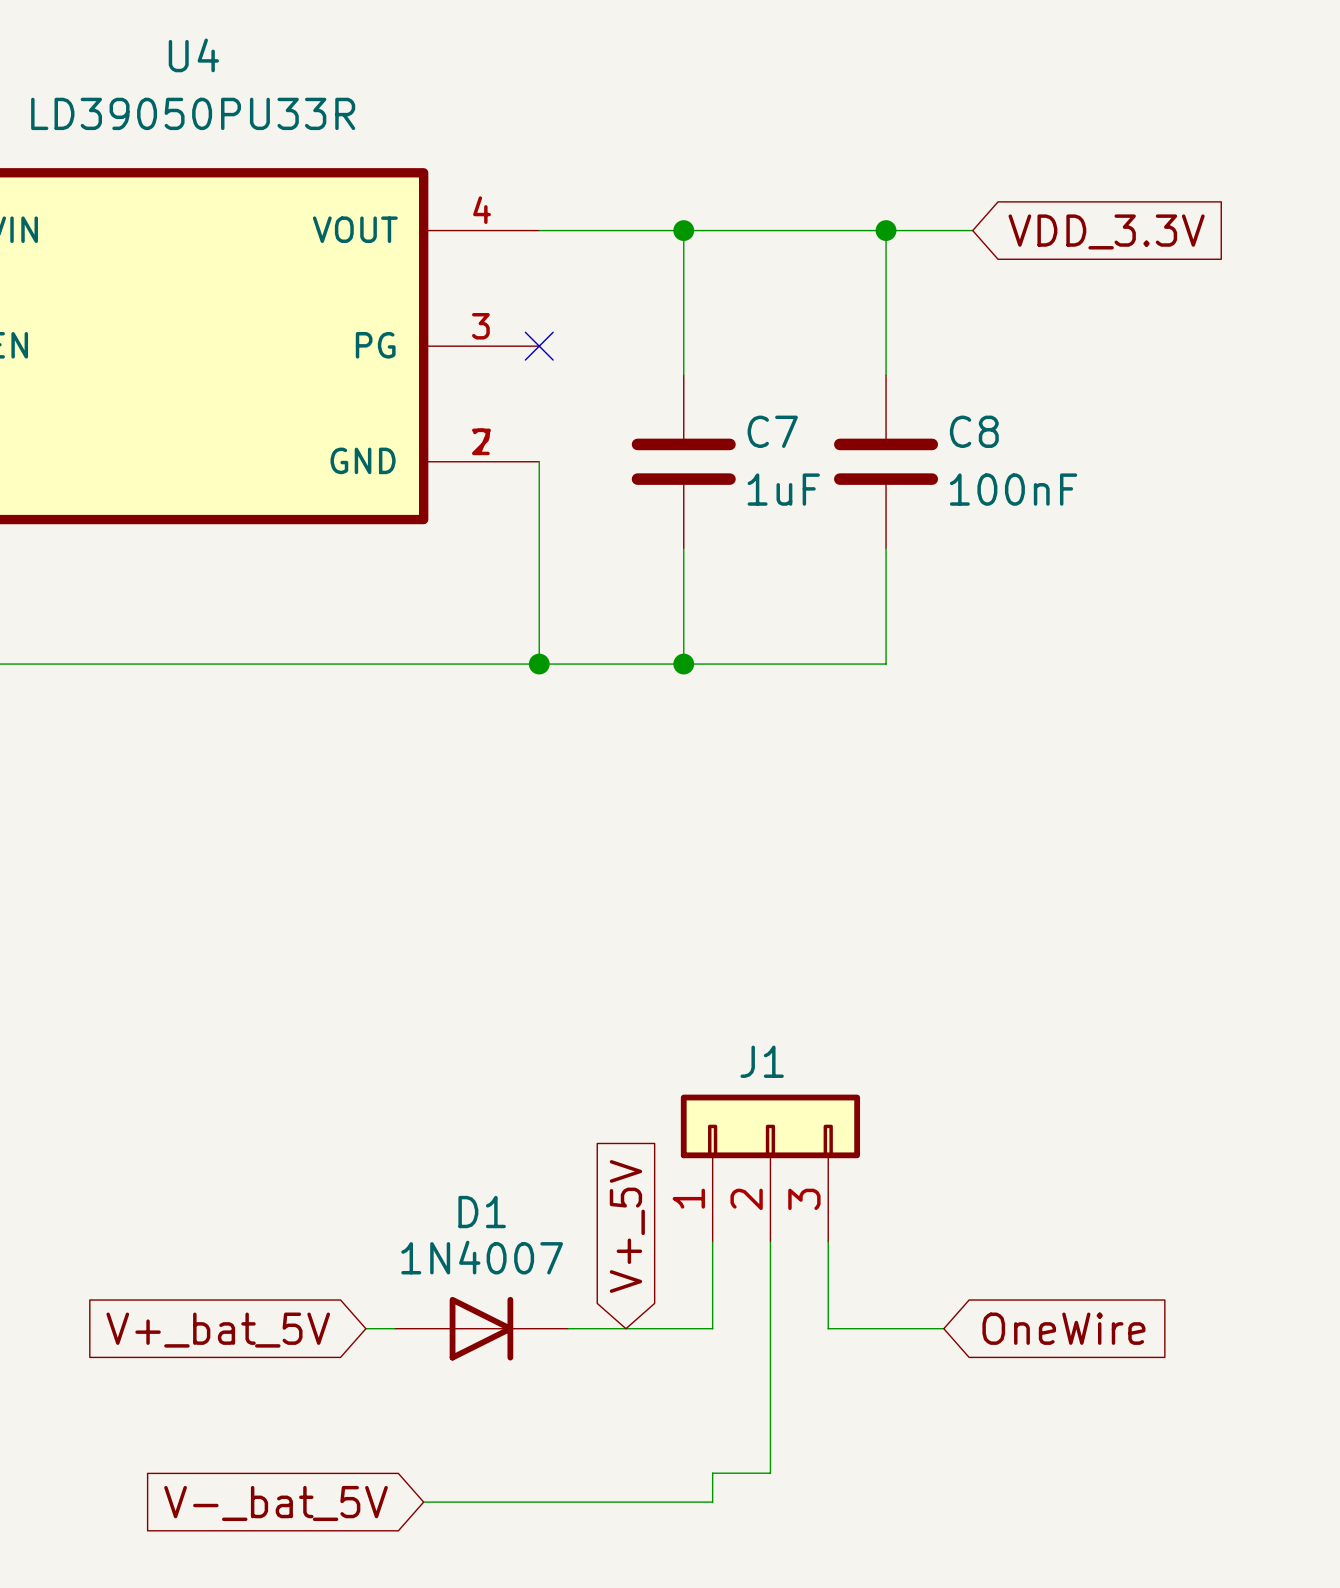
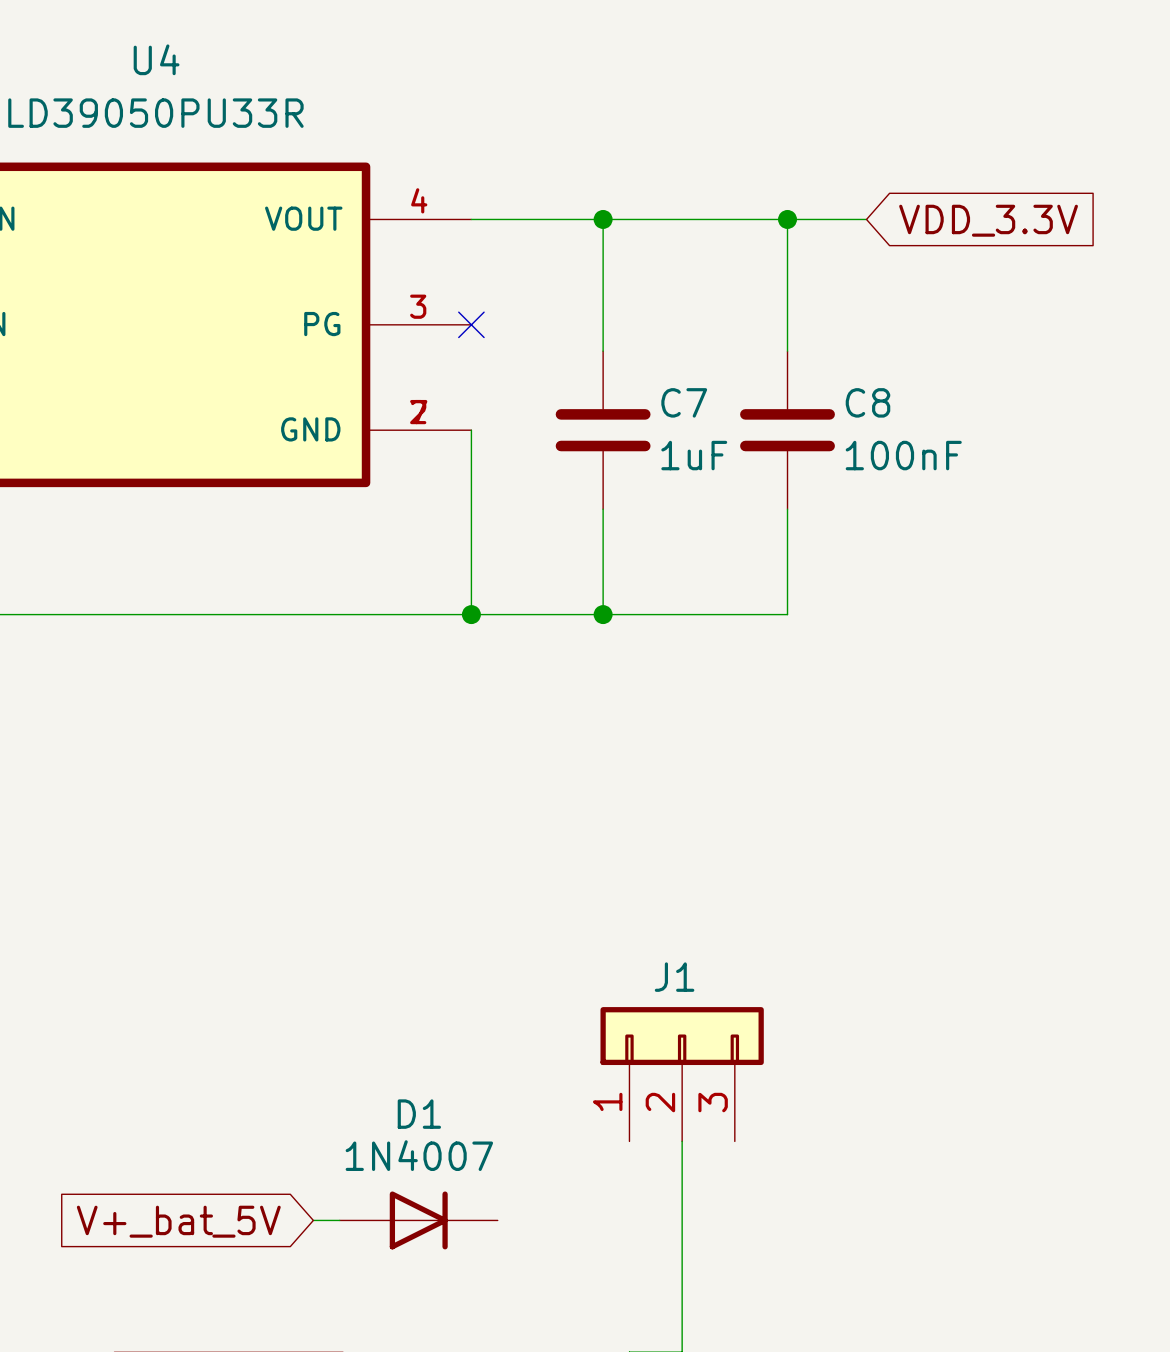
global label: V+_5V (627, 1226) -> none
wire: (712, 1242) (712, 1328) (568, 1328) -> none
wire: (828, 1242) (828, 1328) (943, 1328) -> none
global label: OneWire (1063, 1328) -> none

